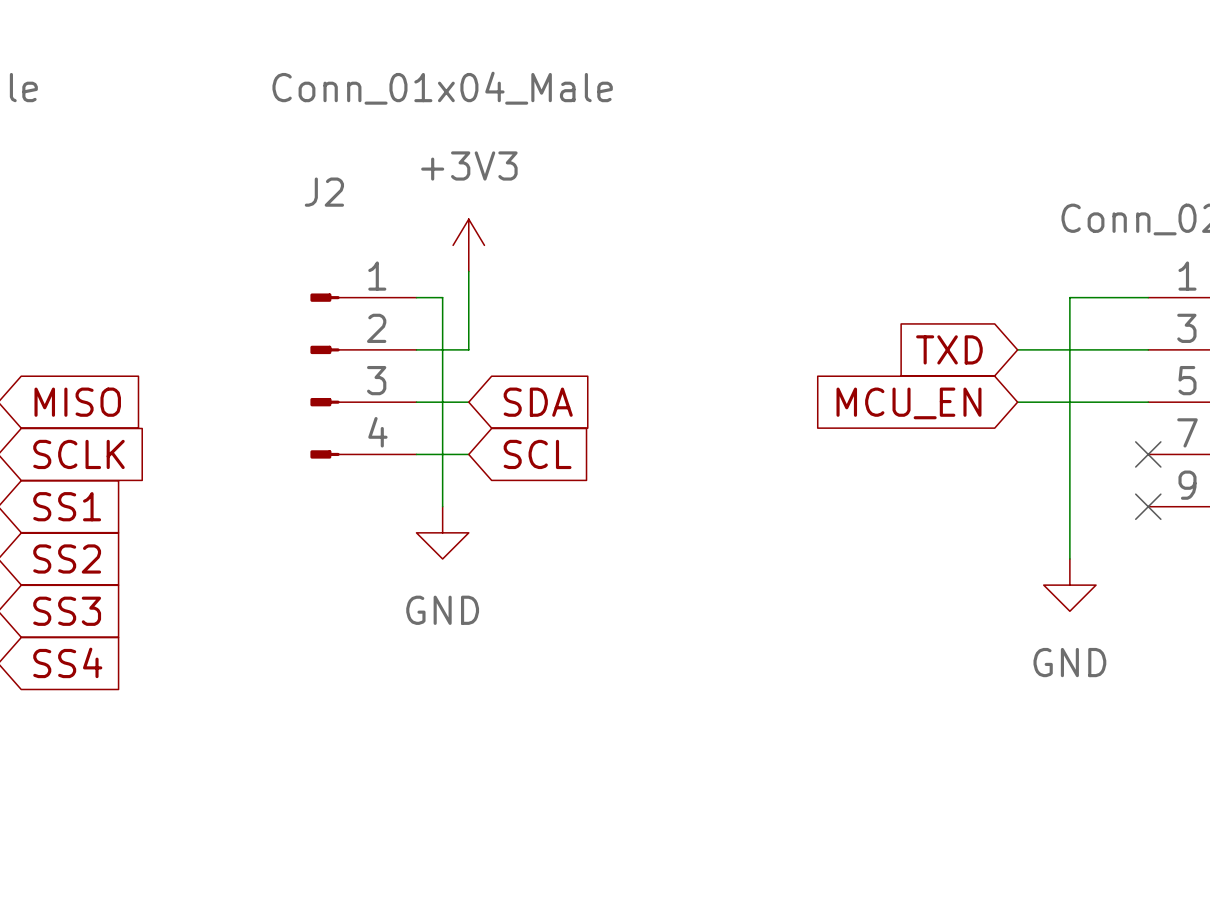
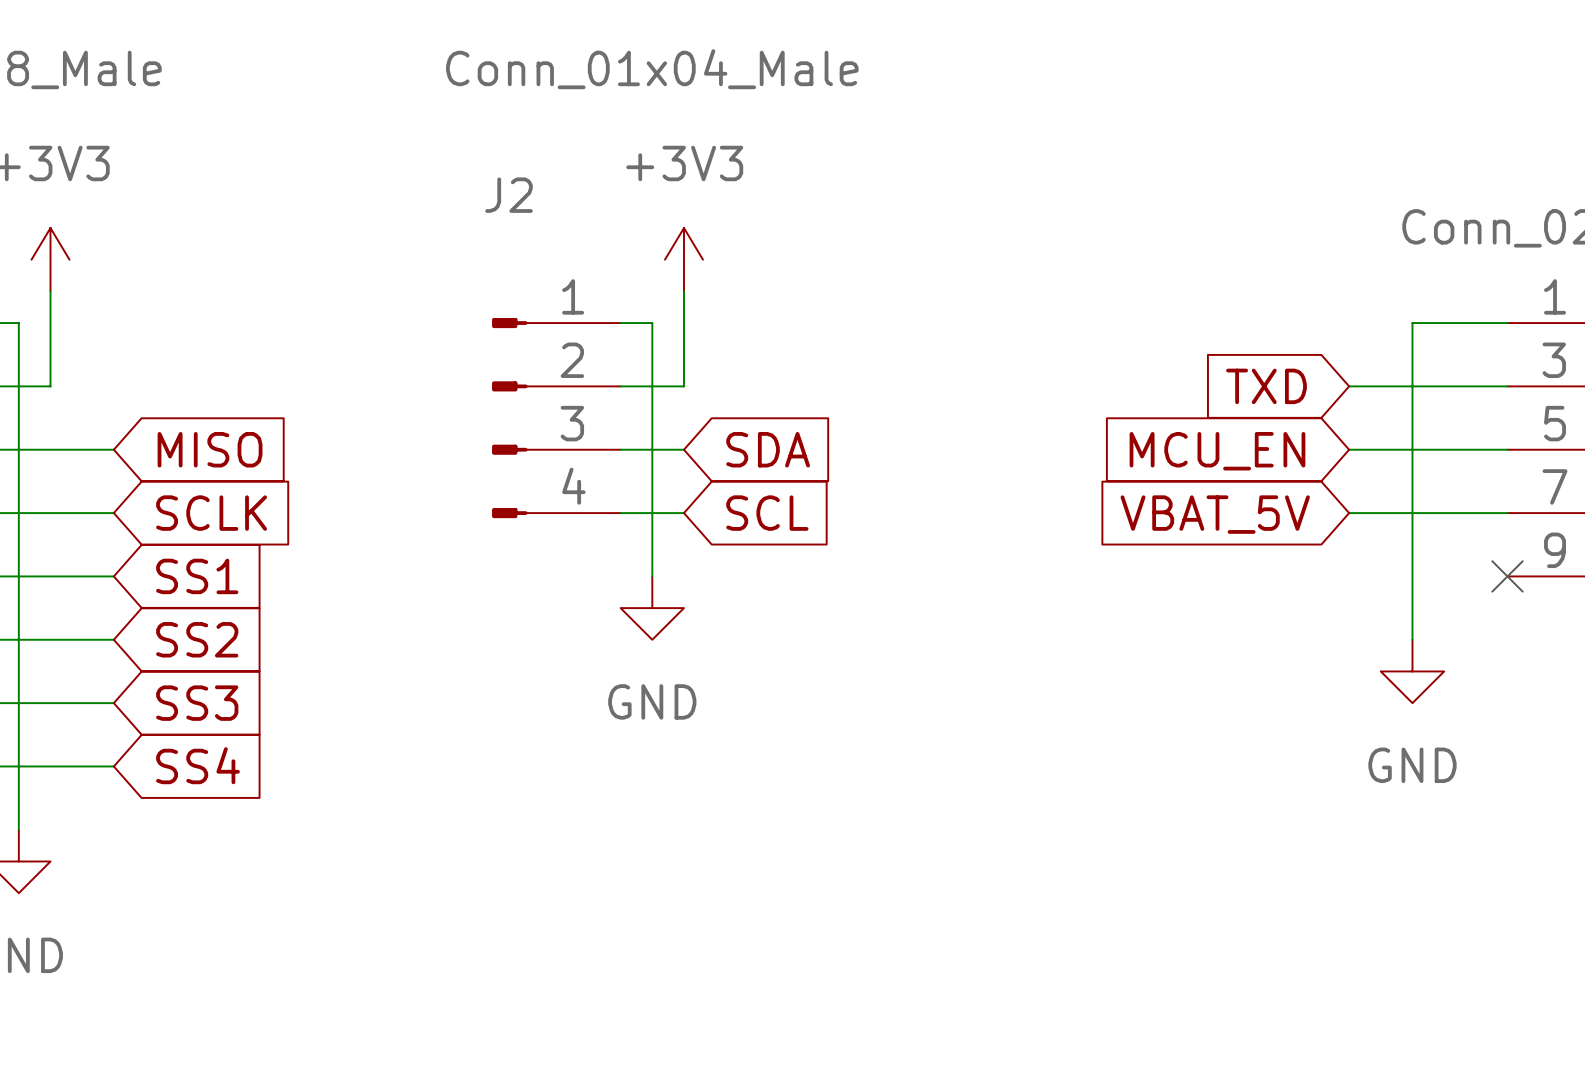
wire: none -> (1349, 513) (1507, 513)
no-connect mark: (1148, 454) -> none
global label: none -> VBAT_5V (1215, 514)

